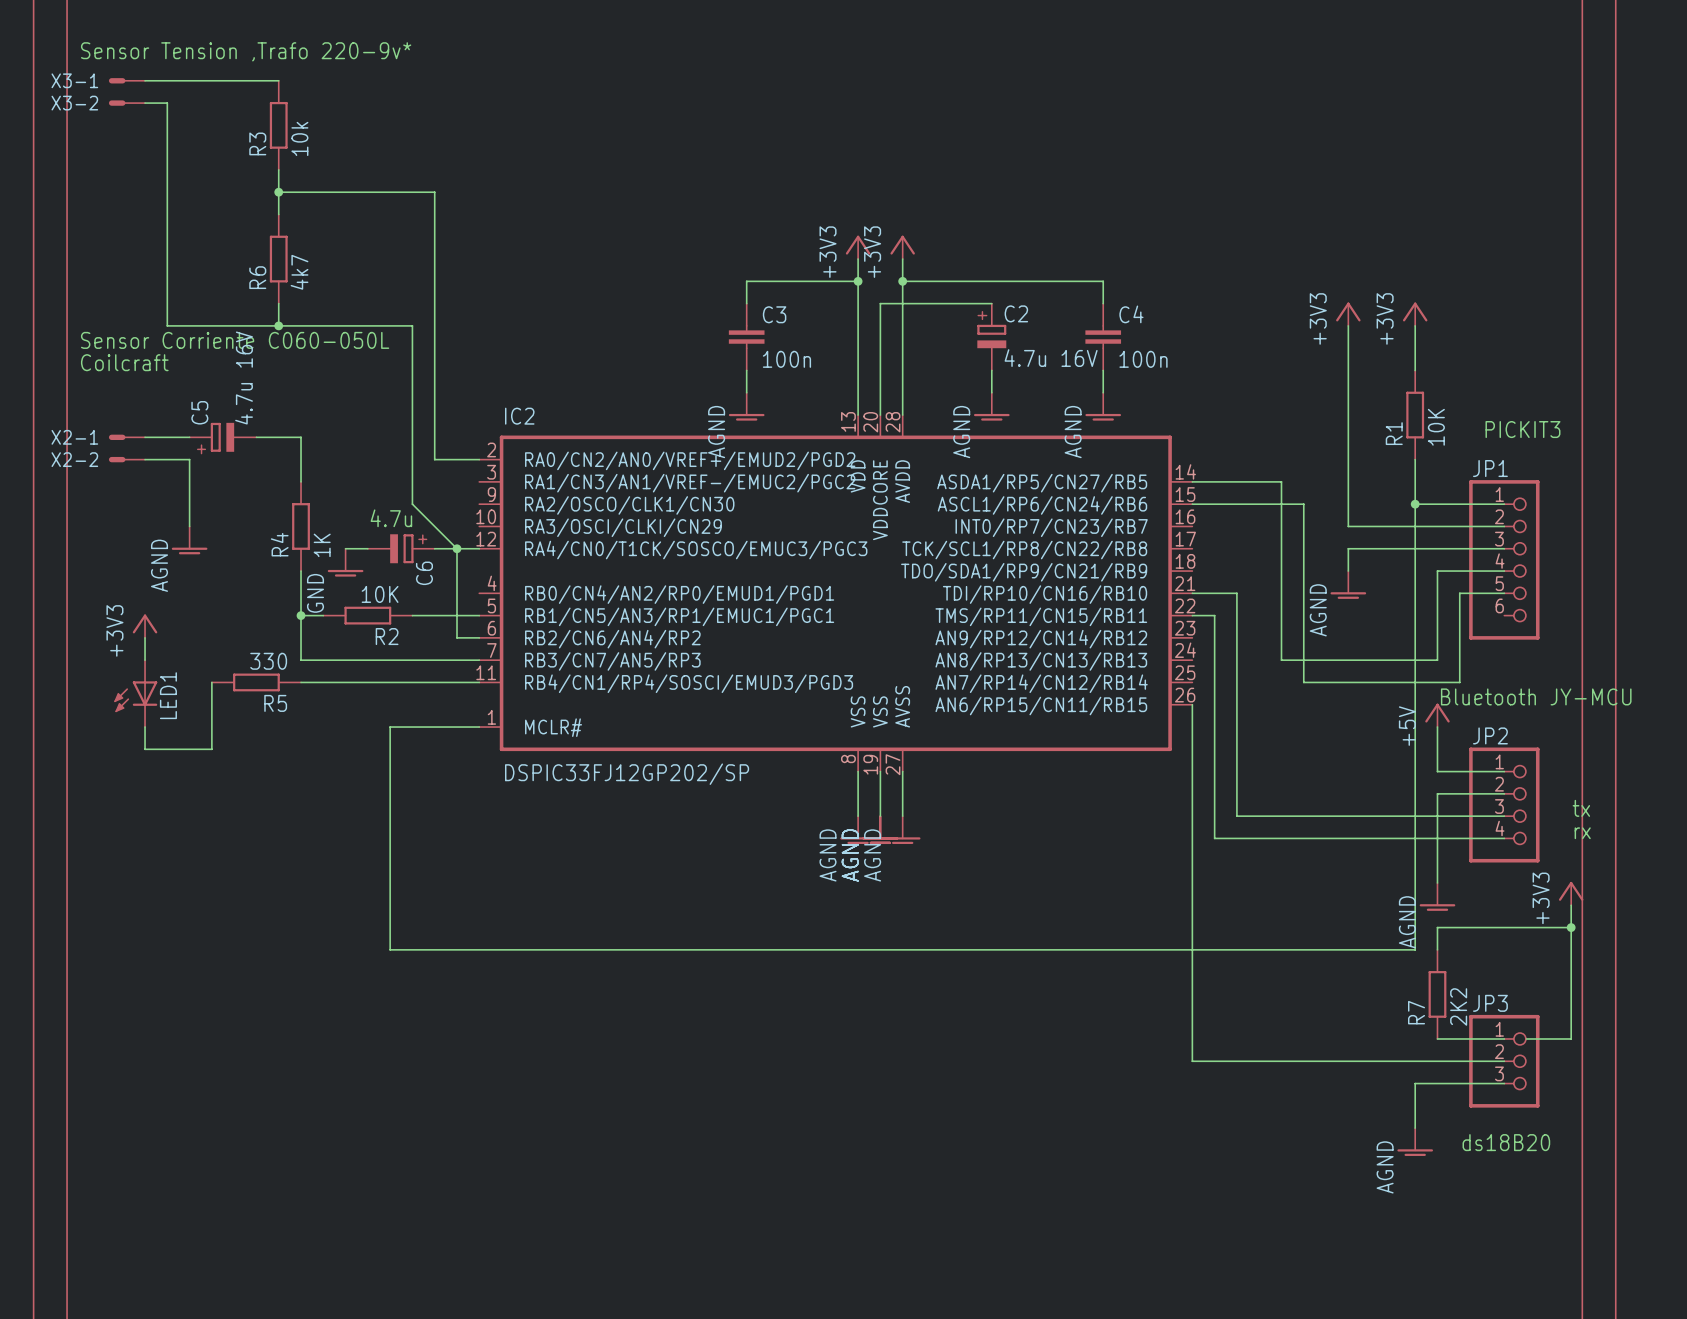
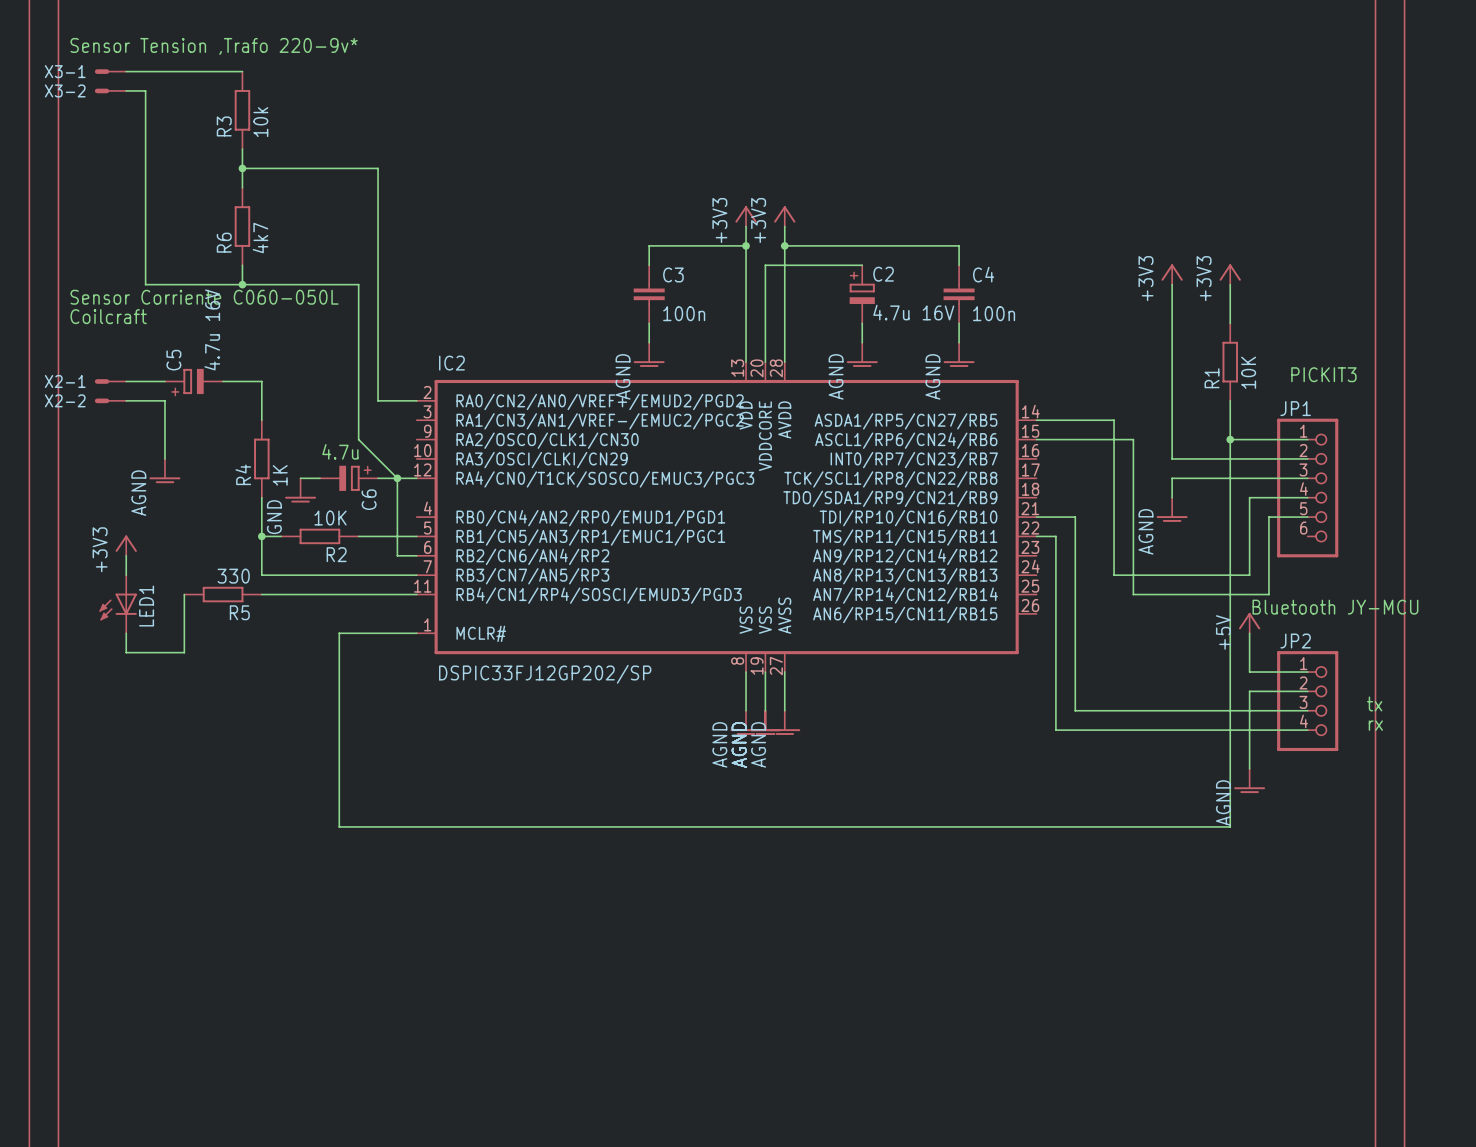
wire: (1192, 704) (1192, 1061) (1504, 1061) -> none
power symbol: +3V3 (1571, 893) -> none
wire: (1571, 905) (1571, 1038) (1526, 1038) -> none
wire: (1571, 927) (1437, 927) (1437, 949) -> none
junction: (1571, 927) -> none
R7: 2K2 (1437, 994) -> none
wire: (1437, 1038) (1504, 1038) -> none
JP3: (1504, 1061) -> none
wire: (1504, 1083) (1415, 1083) (1415, 1128) -> none
power symbol: AGND (1415, 1142) -> none
text: ds18B20 (1506, 1142) -> none

